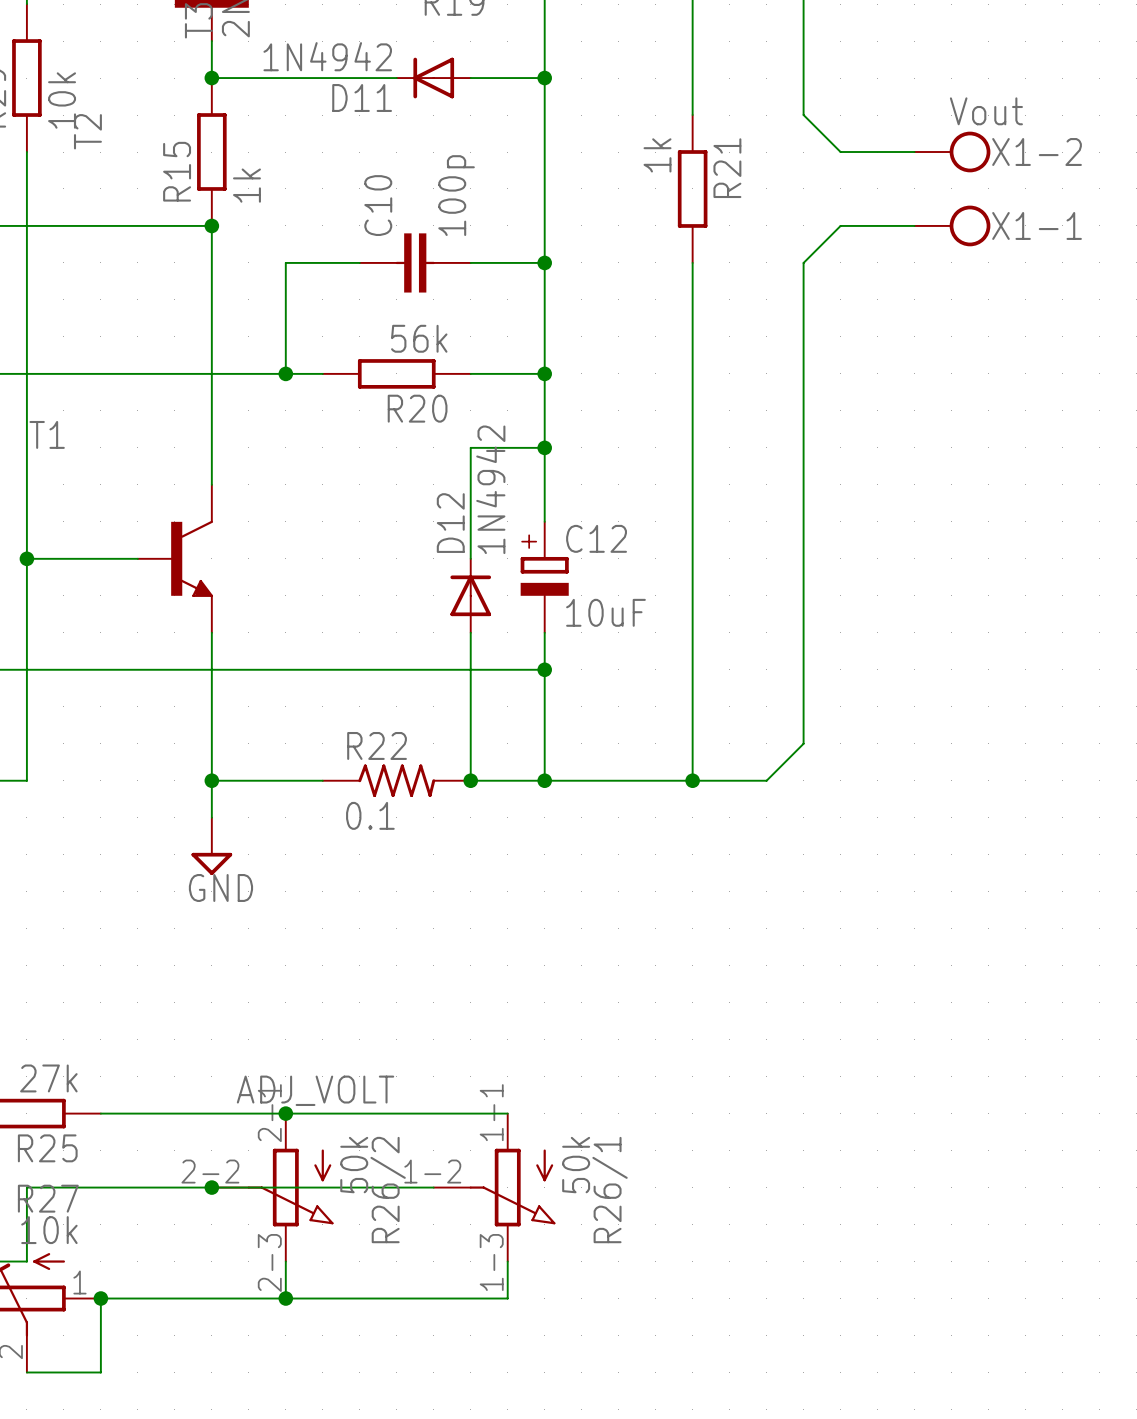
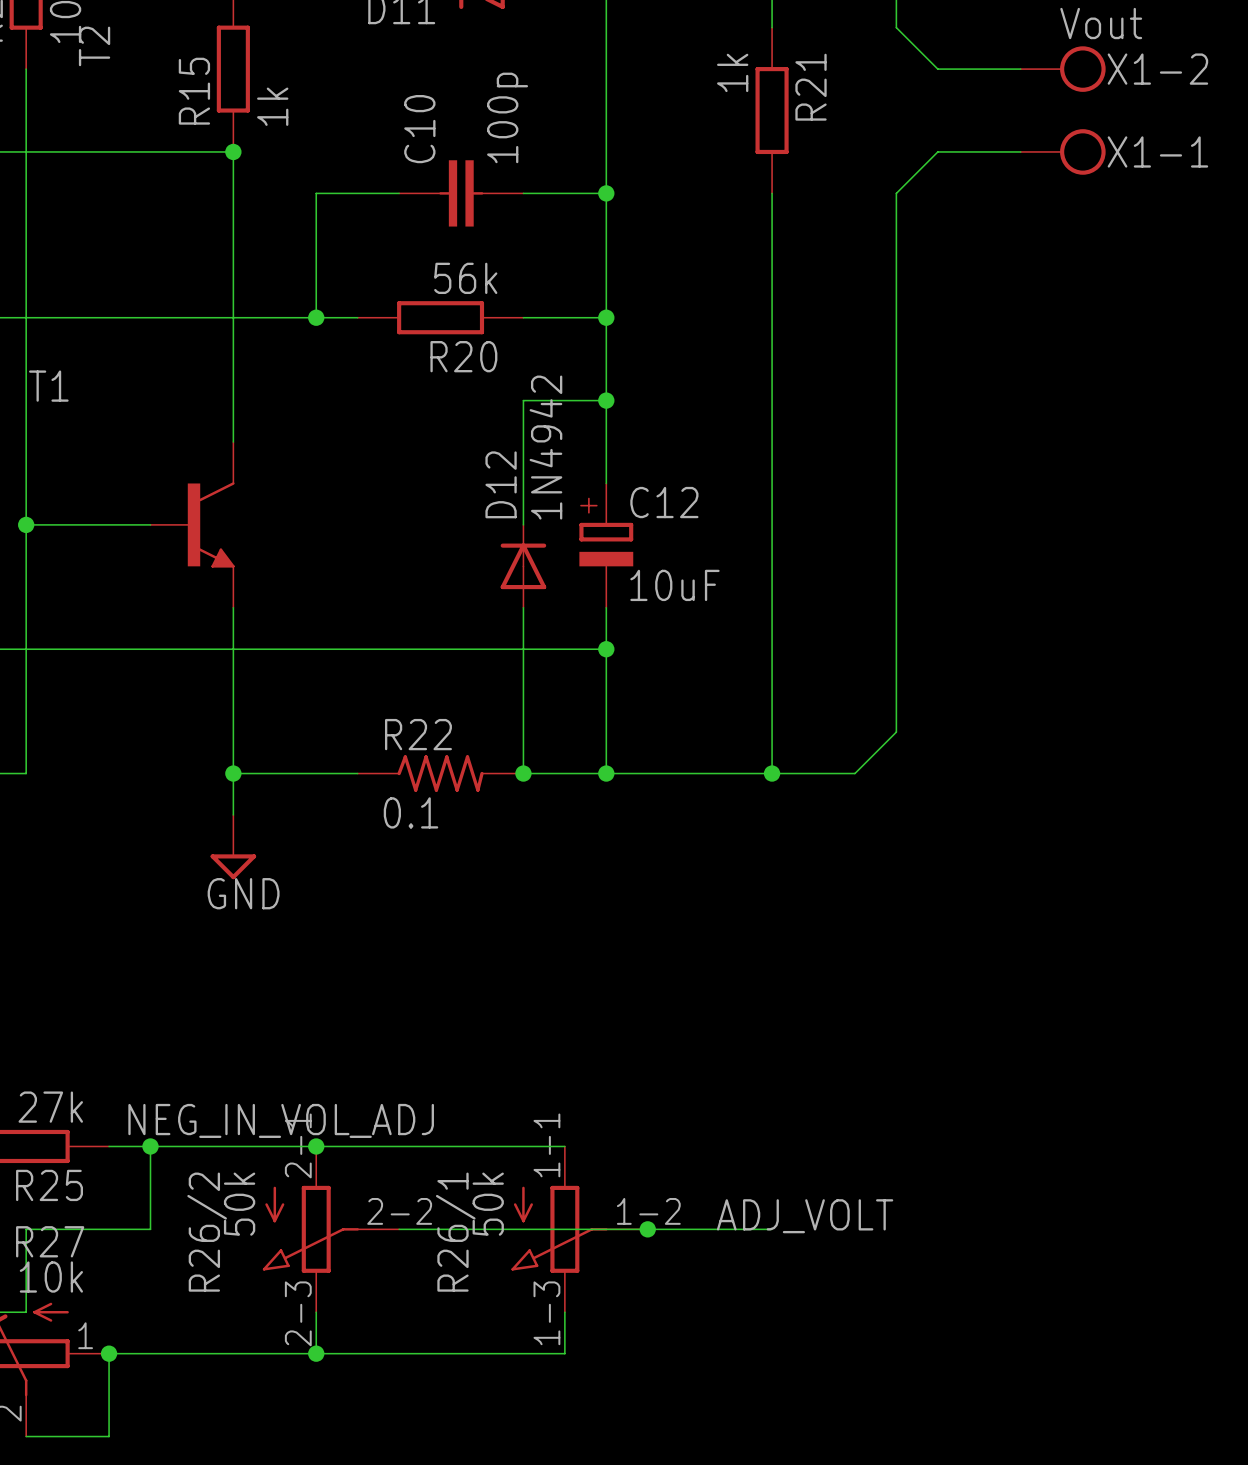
label: ADJ_VOLT (315, 1090) -> NEG_IN_VOL_ADJ (281, 1120)
junction: none -> (150, 1146)
label: none -> ADJ_VOLT (805, 1216)
wire: (137, 1187) (359, 1187) -> (150, 1229) (150, 1146)
junction: (211, 1187) -> none
R26/2 flip: as is (290, 1187) -> left-right (310, 1229)
wire: none -> (482, 1229) (772, 1229)
R26/1 flip: as is (512, 1187) -> left-right (559, 1229)
junction: none -> (647, 1229)

